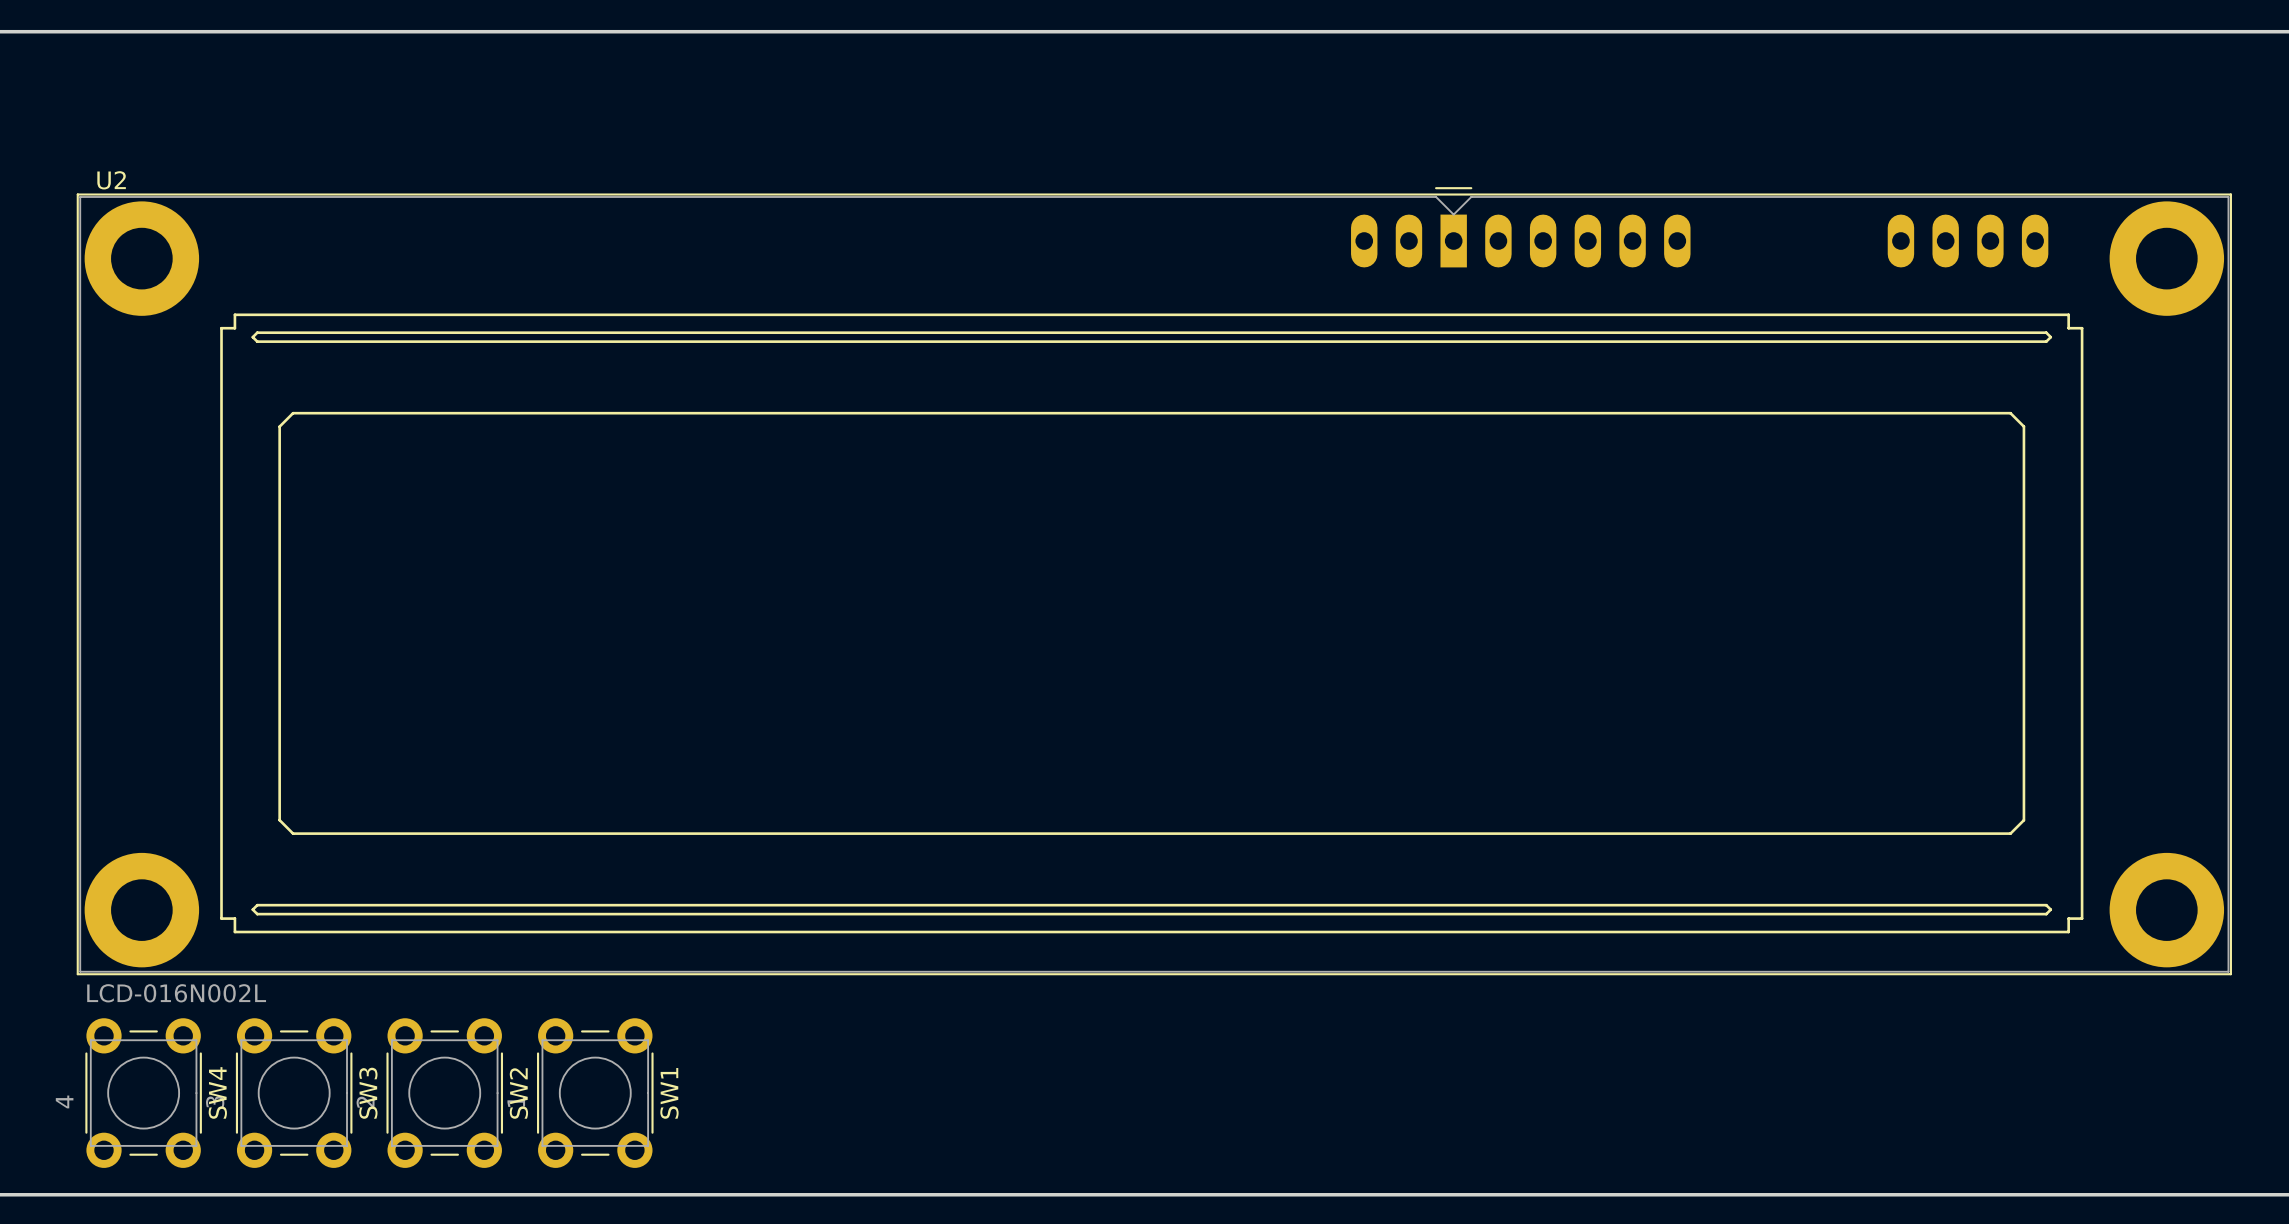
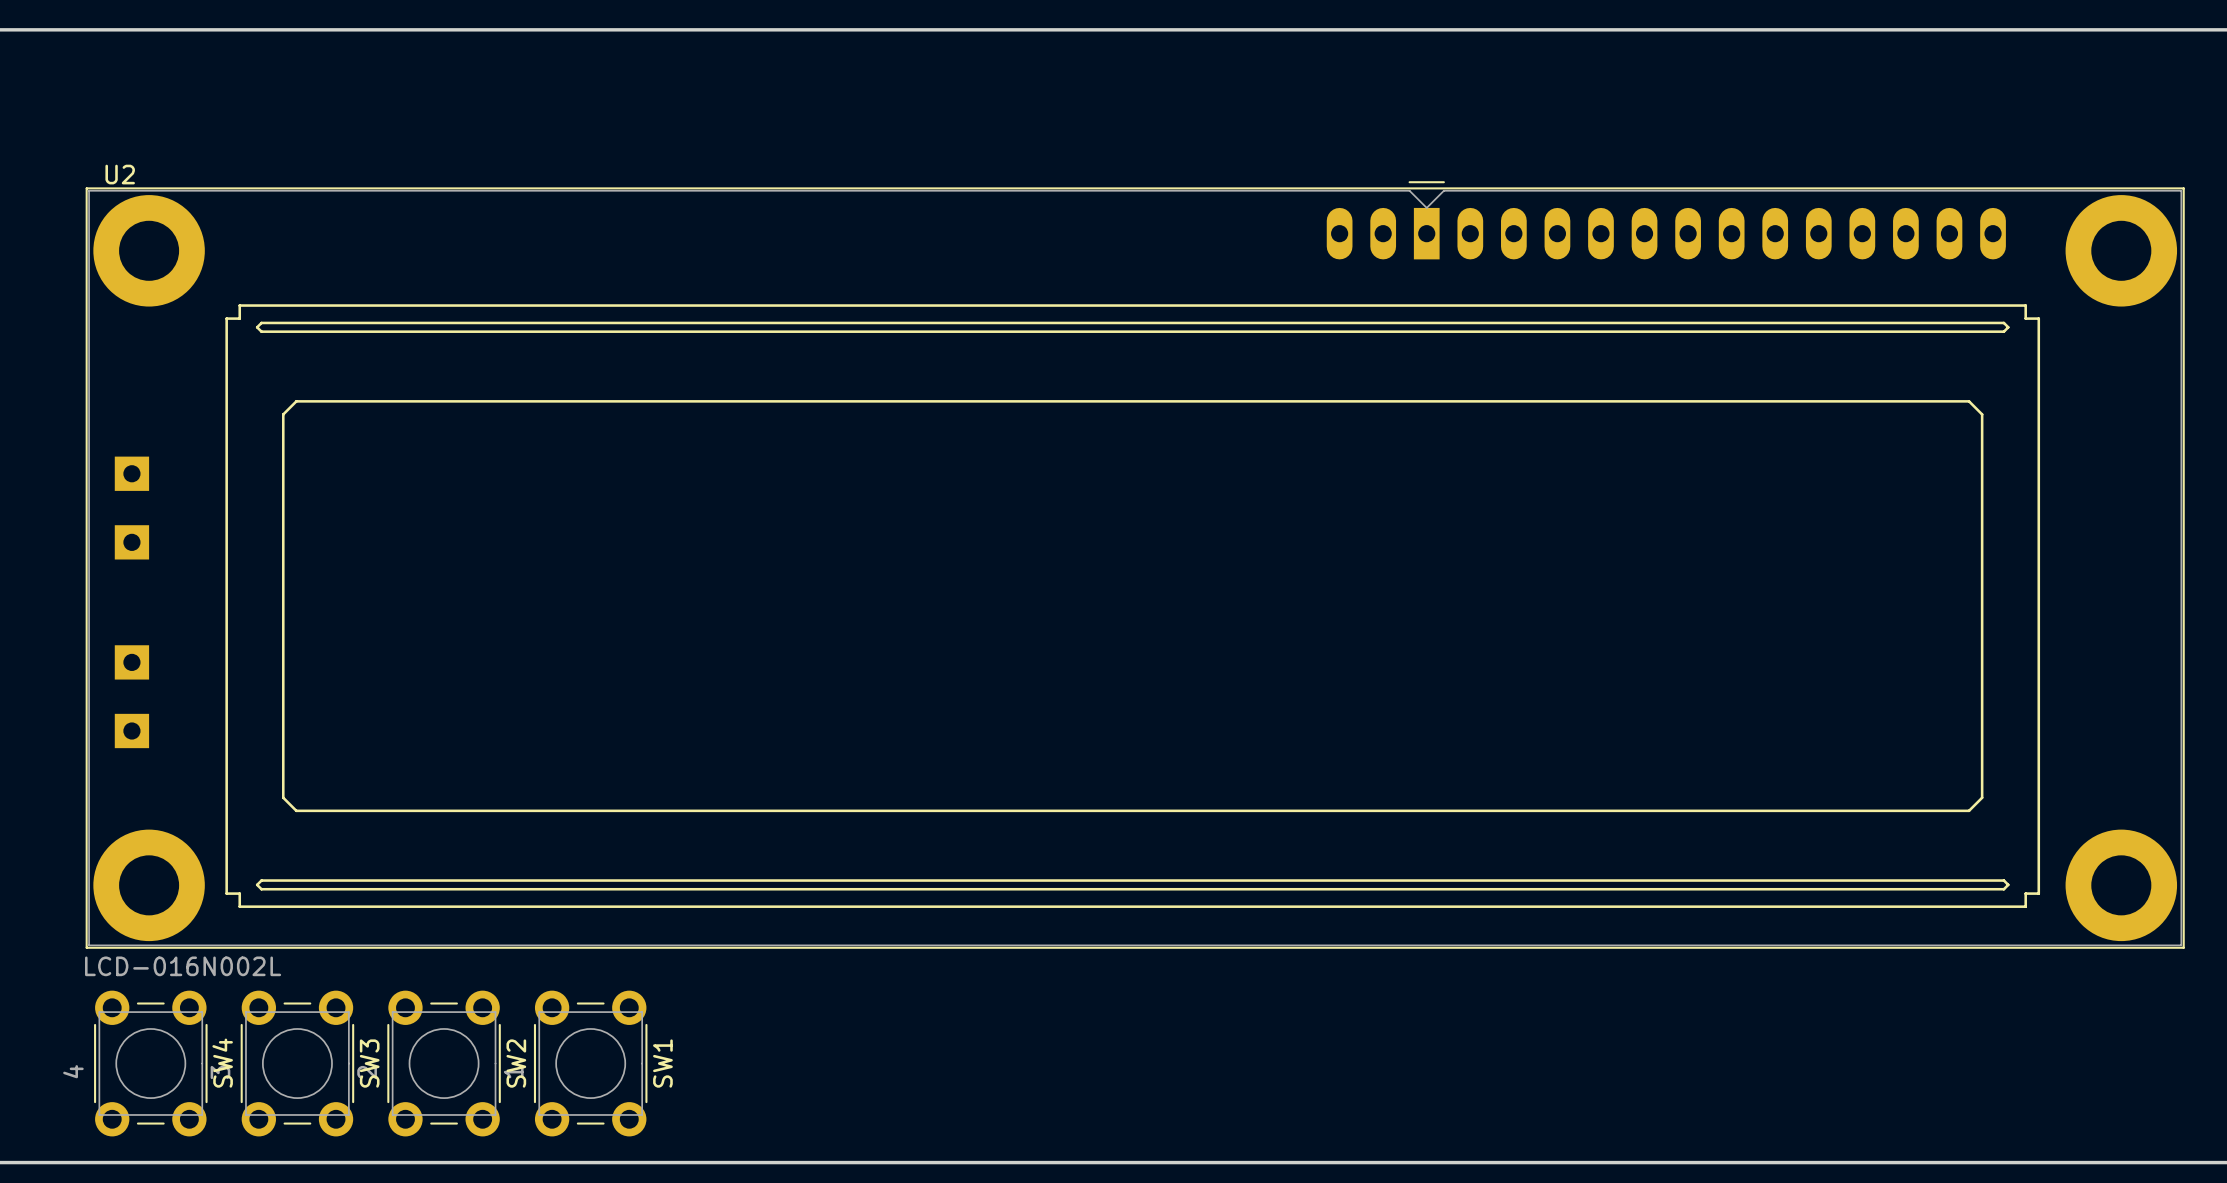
U2 footprint: [76, 187, 2232, 976] -> [85, 181, 2185, 949]

